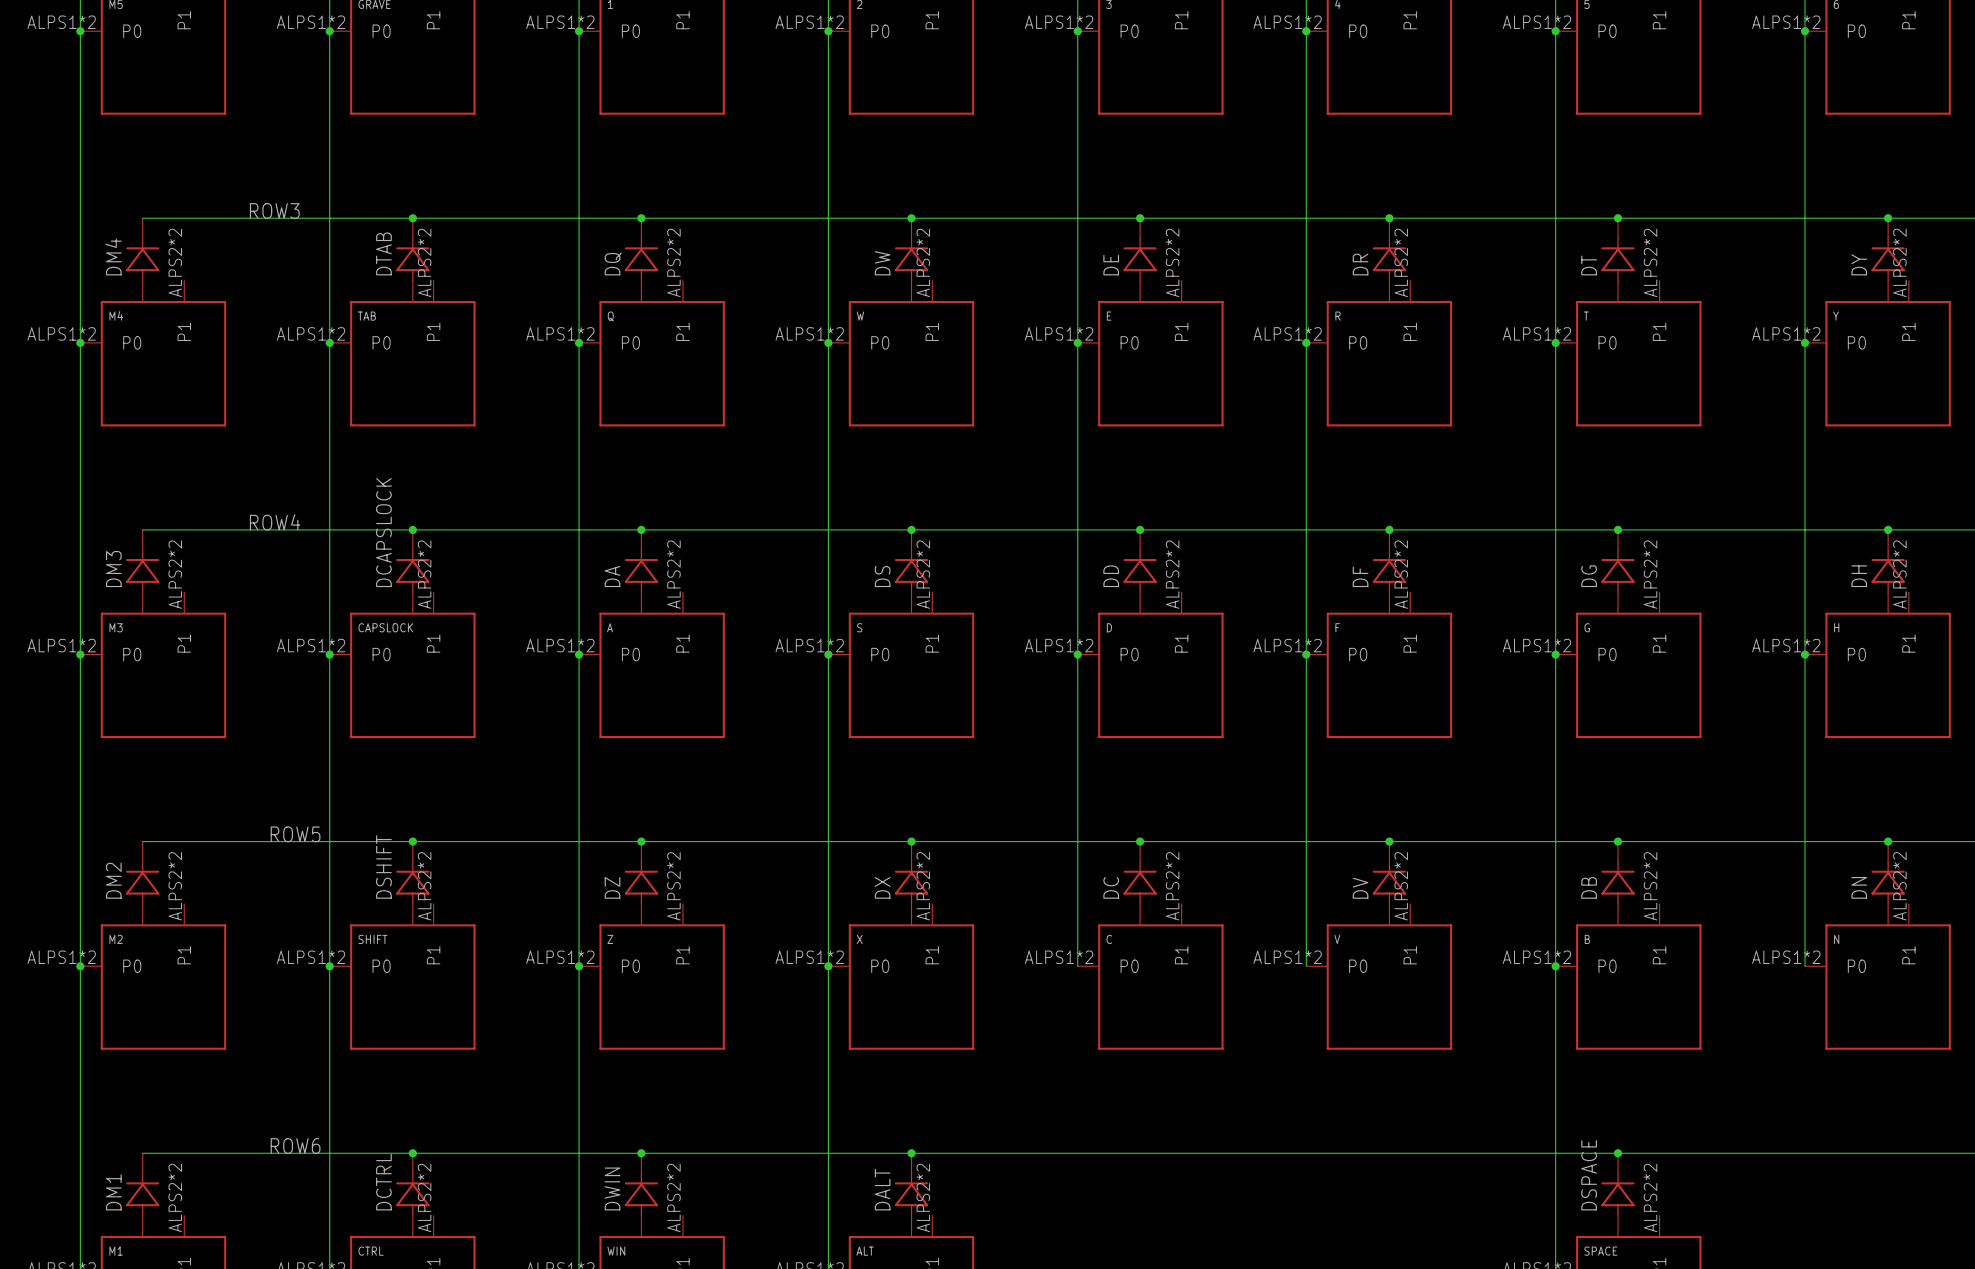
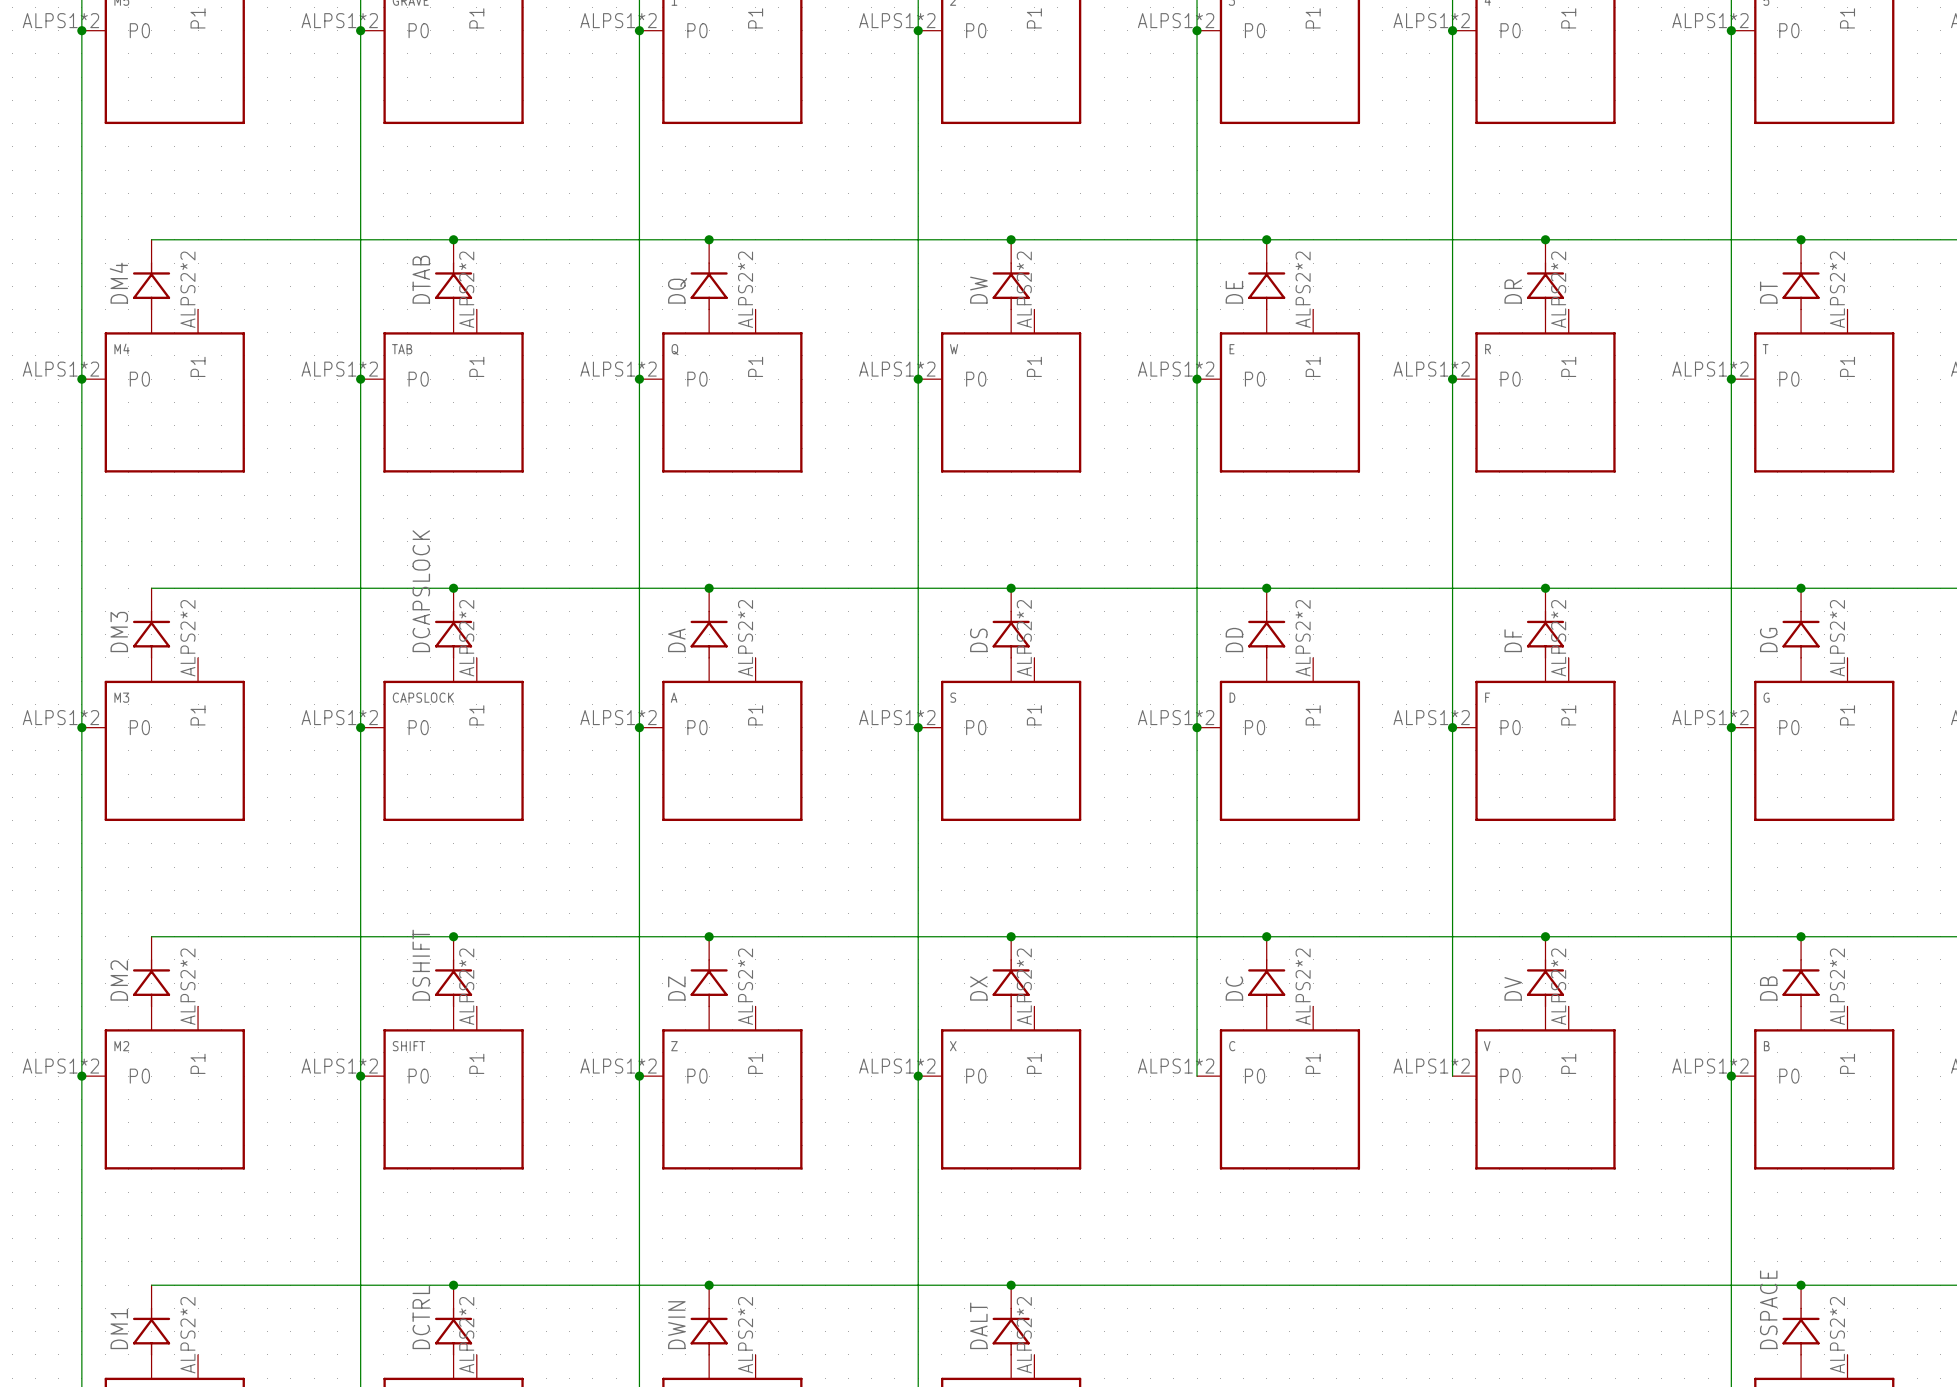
label: ROW3 (274, 210) -> none
label: ROW4 (275, 522) -> none
label: ROW5 (295, 834) -> none
label: ROW6 (295, 1146) -> none

